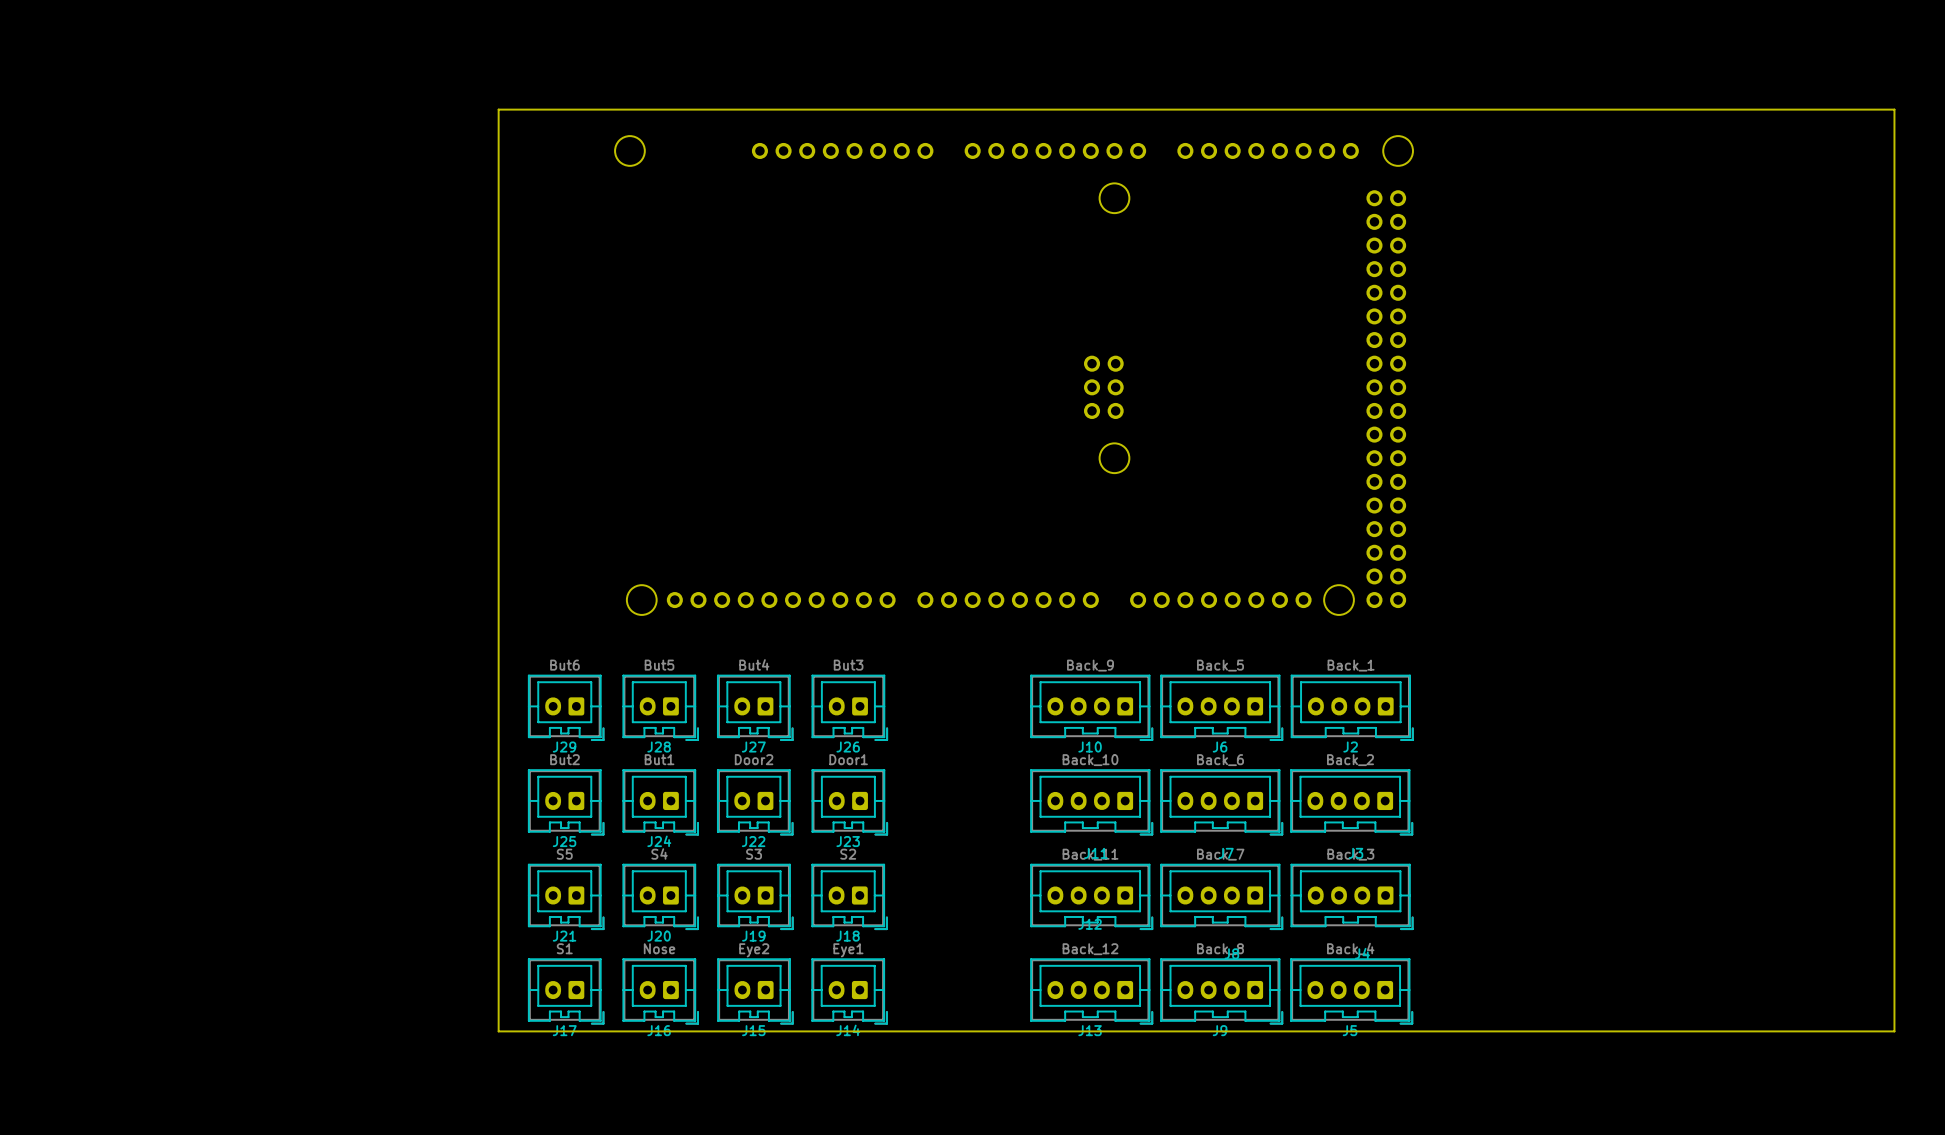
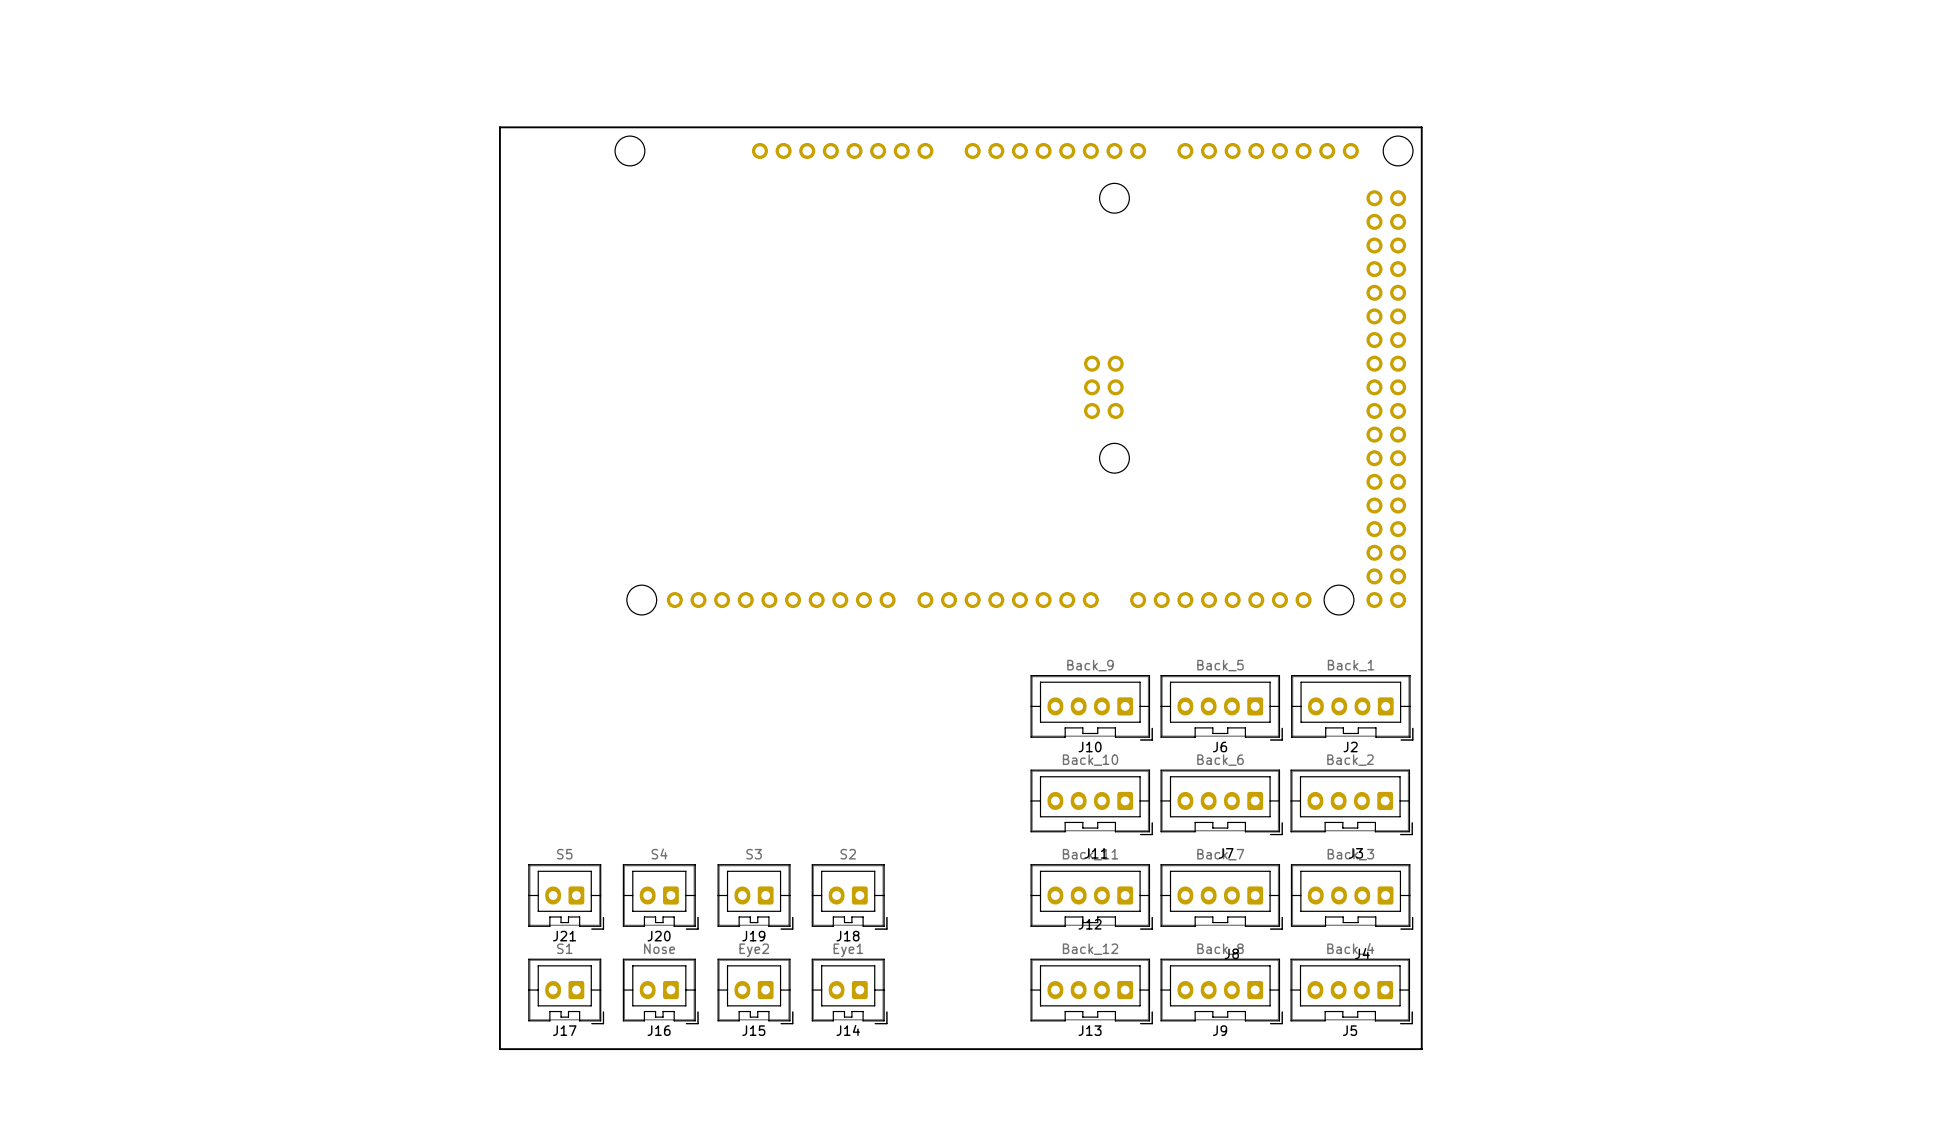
board edge: (1894, 109) (498, 109) (498, 1031) (1894, 1031) (1894, 109) -> (1421, 127) (1421, 1049) (499, 1049) (499, 127) (1421, 127)
J29: But6 (566, 707) -> none
J28: But5 (660, 707) -> none
J27: But4 (755, 707) -> none
J26: But3 (849, 707) -> none
J25: But2 (566, 802) -> none
J24: But1 (660, 802) -> none
J22: Door2 (755, 802) -> none
J23: Door1 (849, 802) -> none

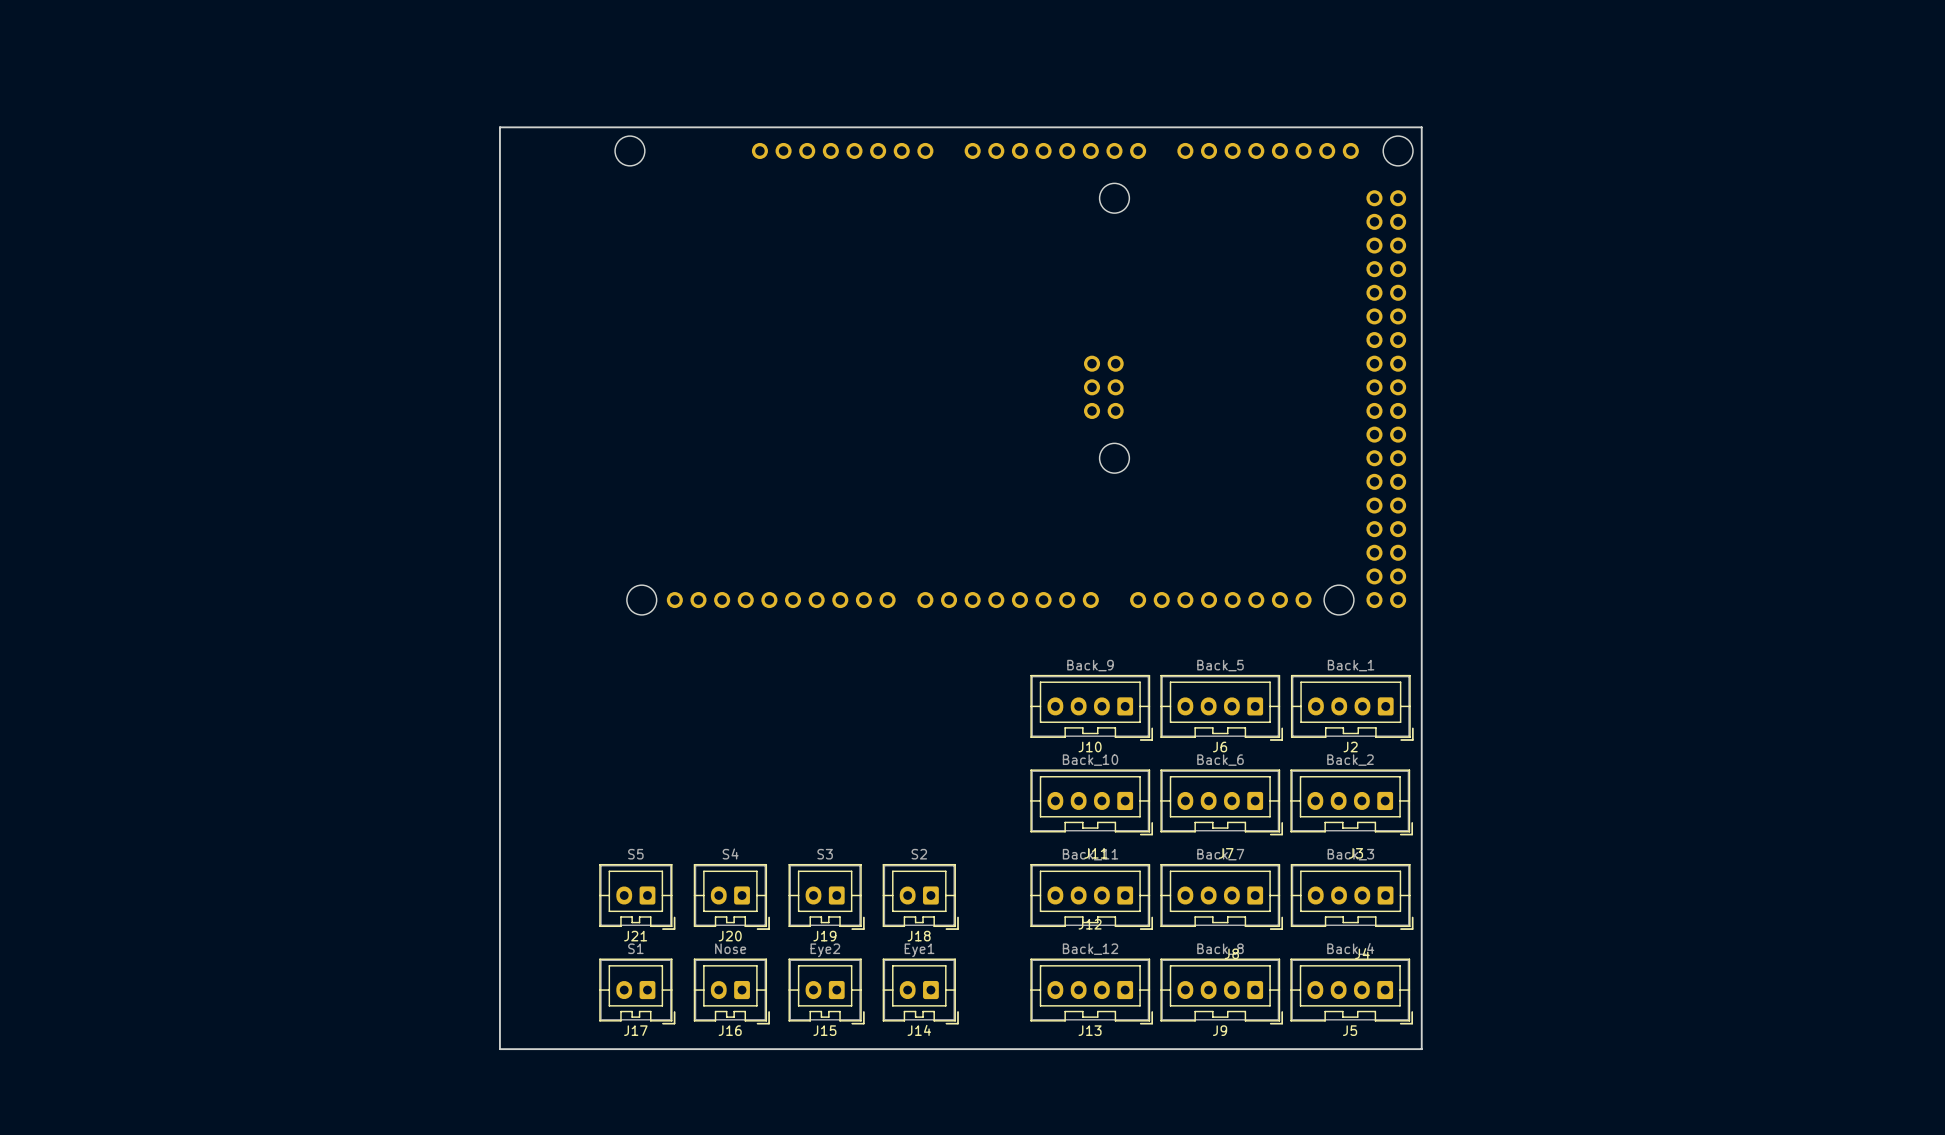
J21 position: (566, 896) -> (637, 896)
J20 position: (660, 896) -> (731, 896)
J19 position: (755, 896) -> (826, 896)
J18 position: (849, 896) -> (920, 896)
J17 position: (566, 991) -> (637, 991)
J16 position: (660, 991) -> (731, 991)
J15 position: (755, 991) -> (826, 991)
J14 position: (849, 991) -> (920, 991)

